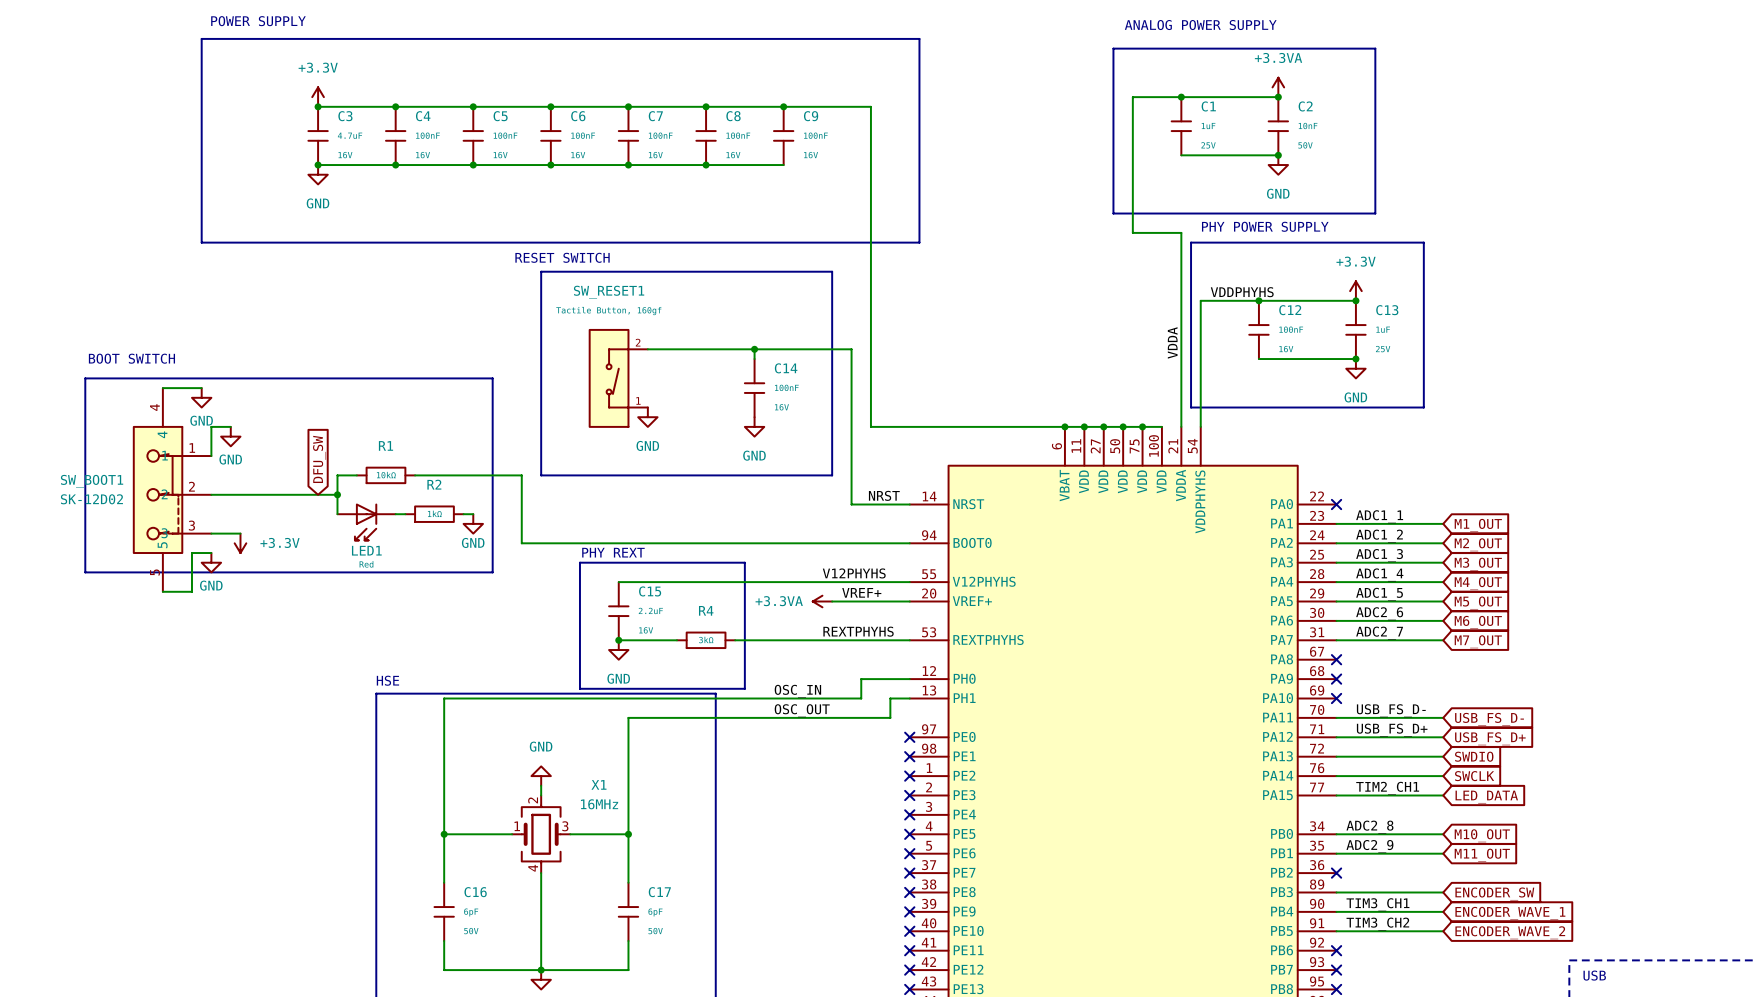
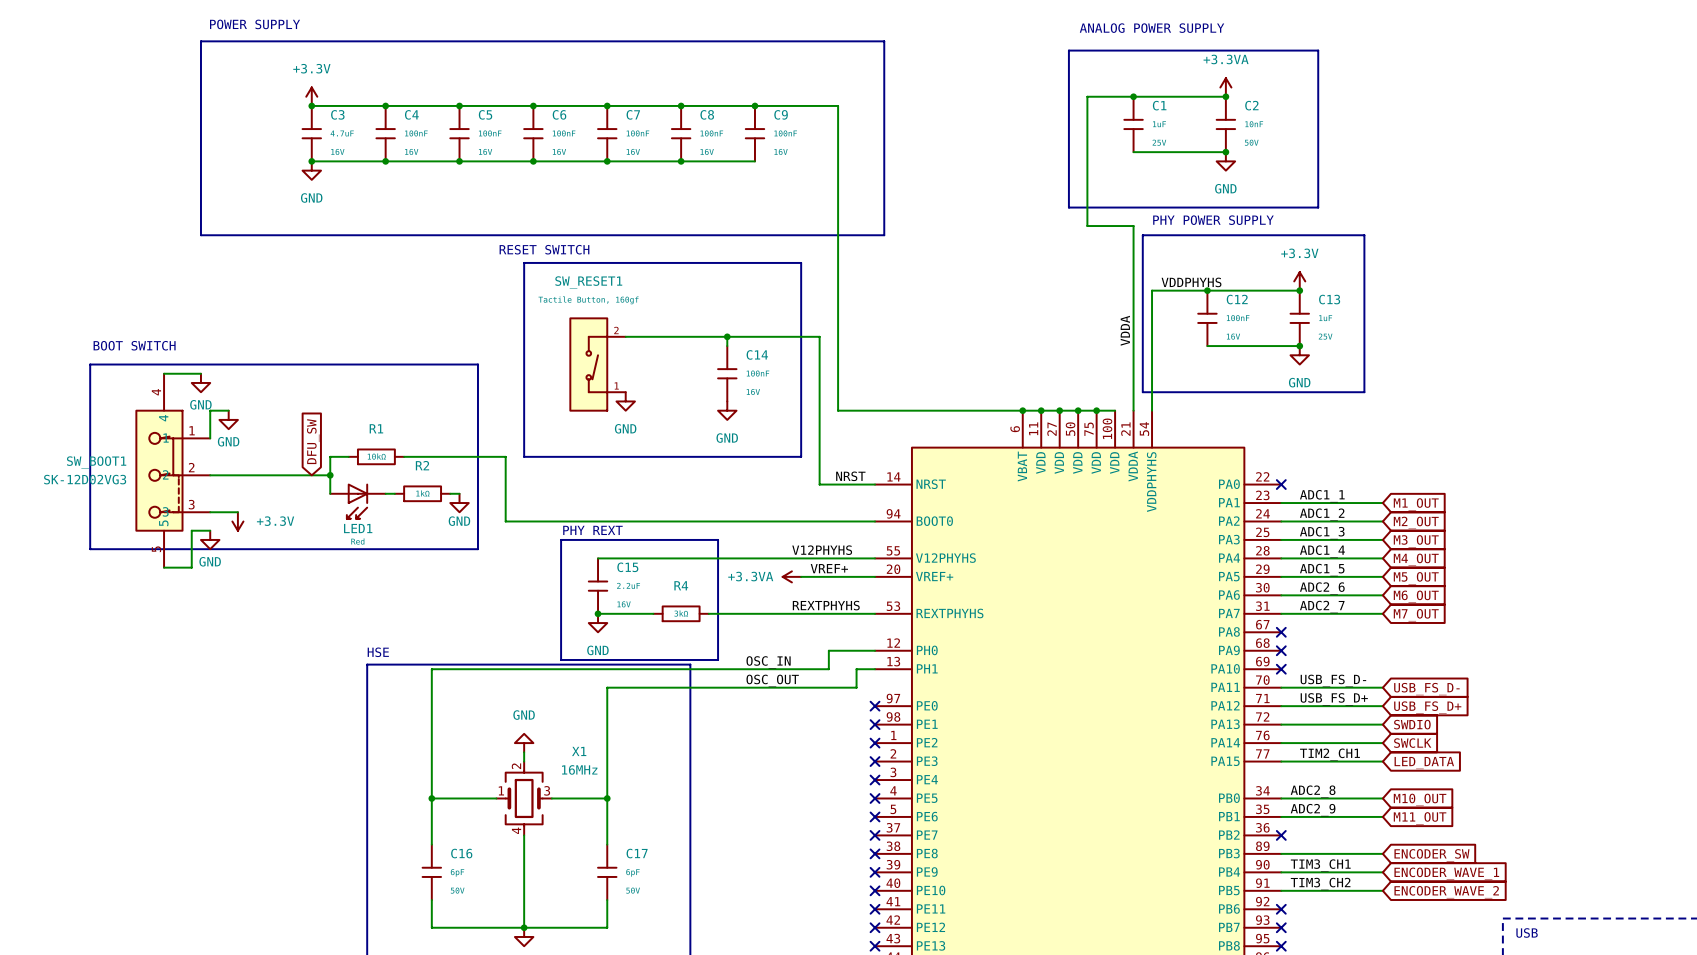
SW_BOOT1 value: SK-12D02 (91, 499) -> SK-12D02VG3 (85, 479)

